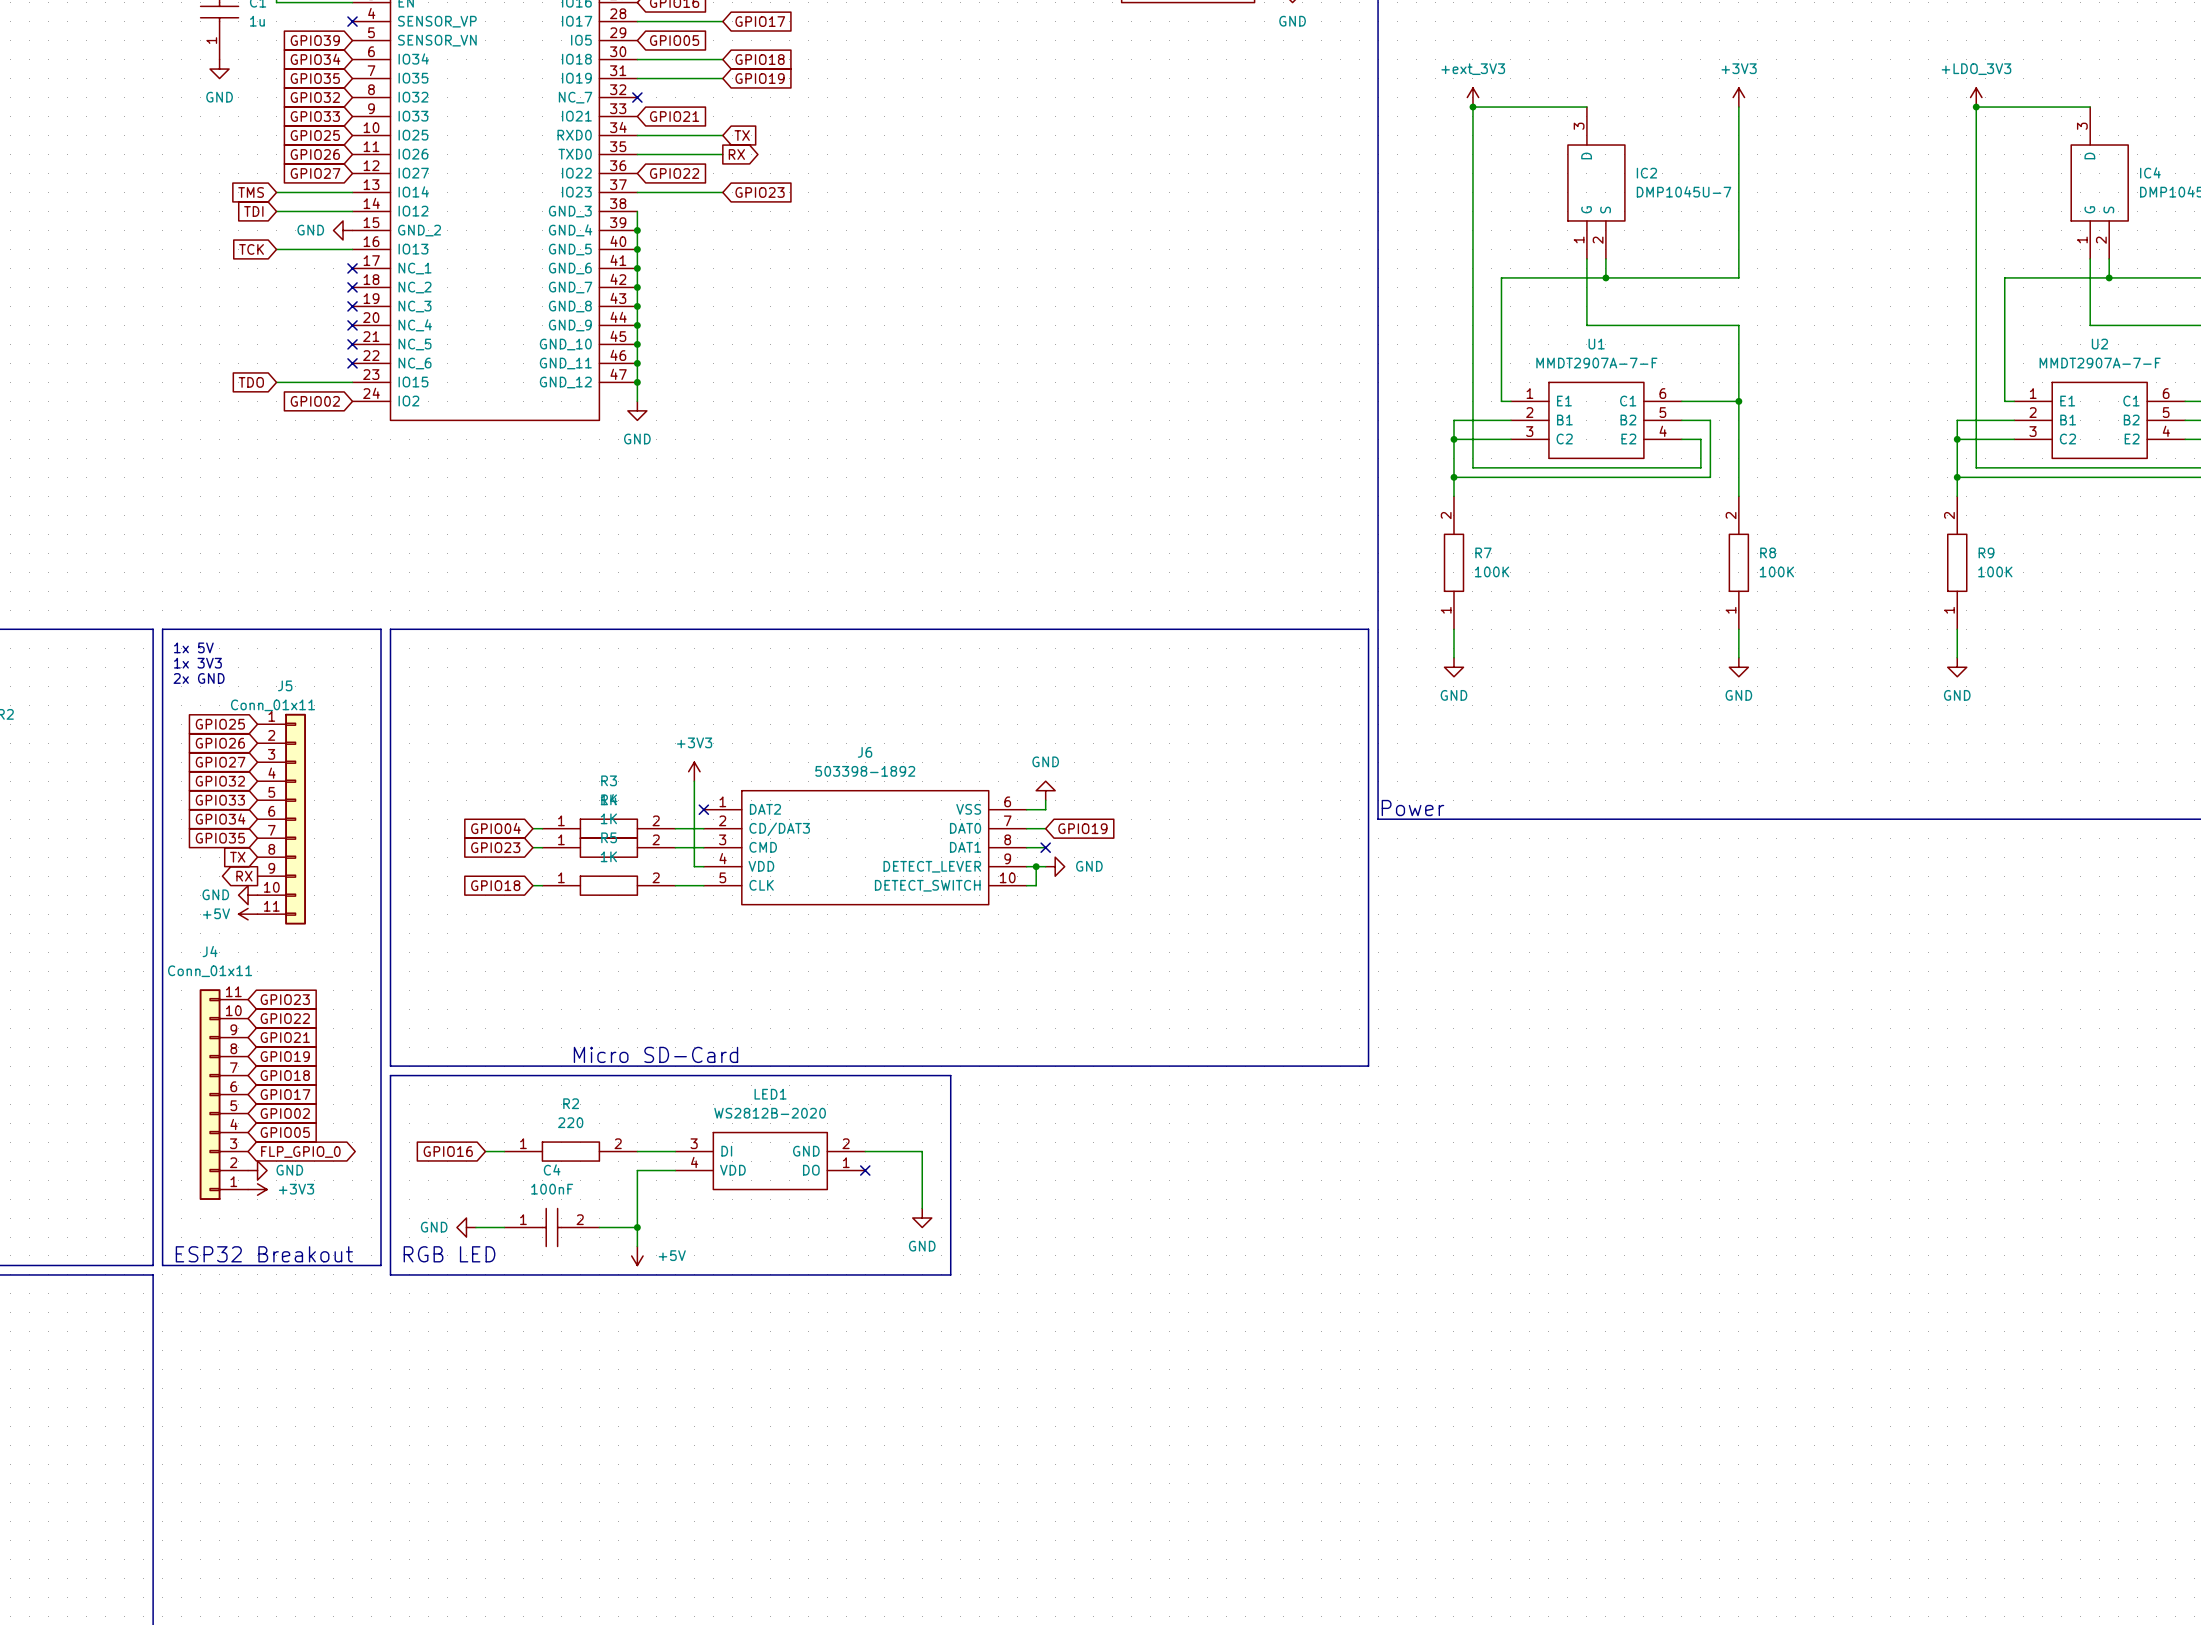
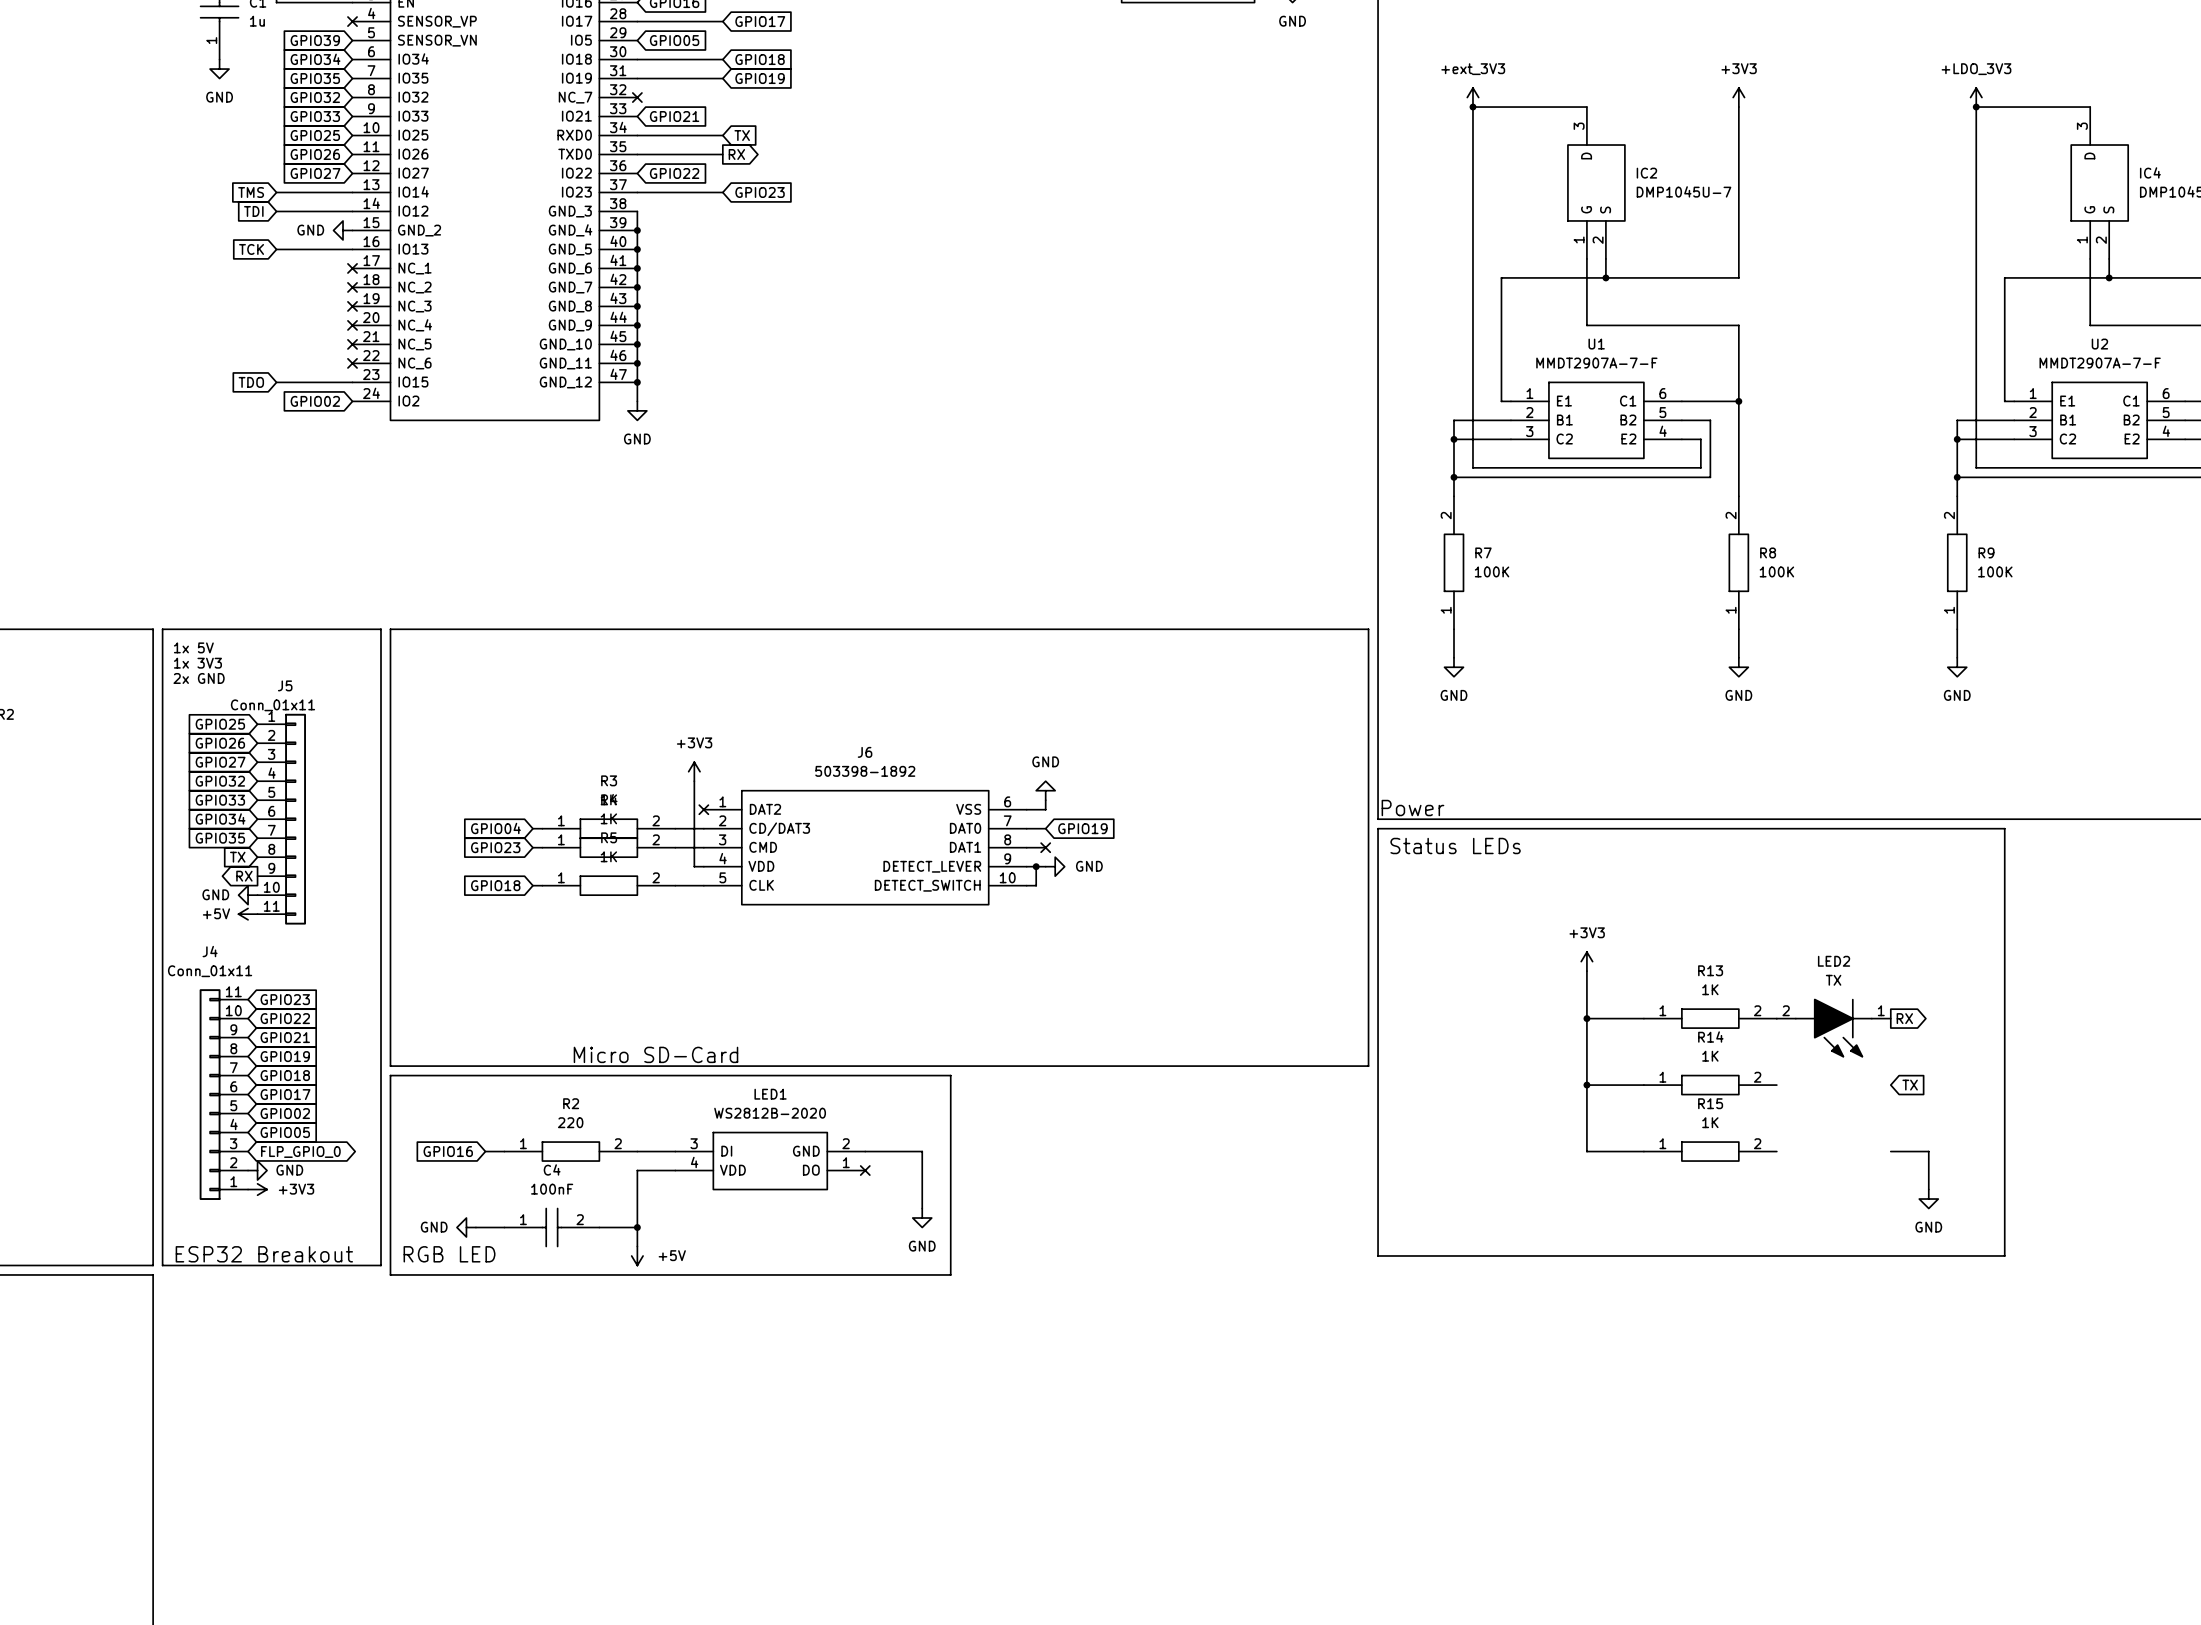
line: none -> (1378, 828) (1378, 1255) (2004, 1255) (2004, 828) (1378, 828)
text: none -> Status LEDs (1455, 846)
power symbol: none -> +3V3 (1586, 961)
wire: none -> (1586, 971) (1586, 1151) (1643, 1151)
wire: none -> (1586, 1018) (1643, 1018)
junction: none -> (1586, 1018)
R13: none -> 1K (1710, 1018)
global label: none -> RX (1904, 1018)
LED2: none -> TX (1833, 1028)
wire: none -> (1586, 1085) (1643, 1085)
junction: none -> (1586, 1085)
R14: none -> 1K (1710, 1085)
global label: none -> TX (1910, 1085)
R15: none -> 1K (1710, 1151)
wire: none -> (1890, 1151) (1928, 1151) (1928, 1189)
power symbol: none -> GND (1928, 1199)

